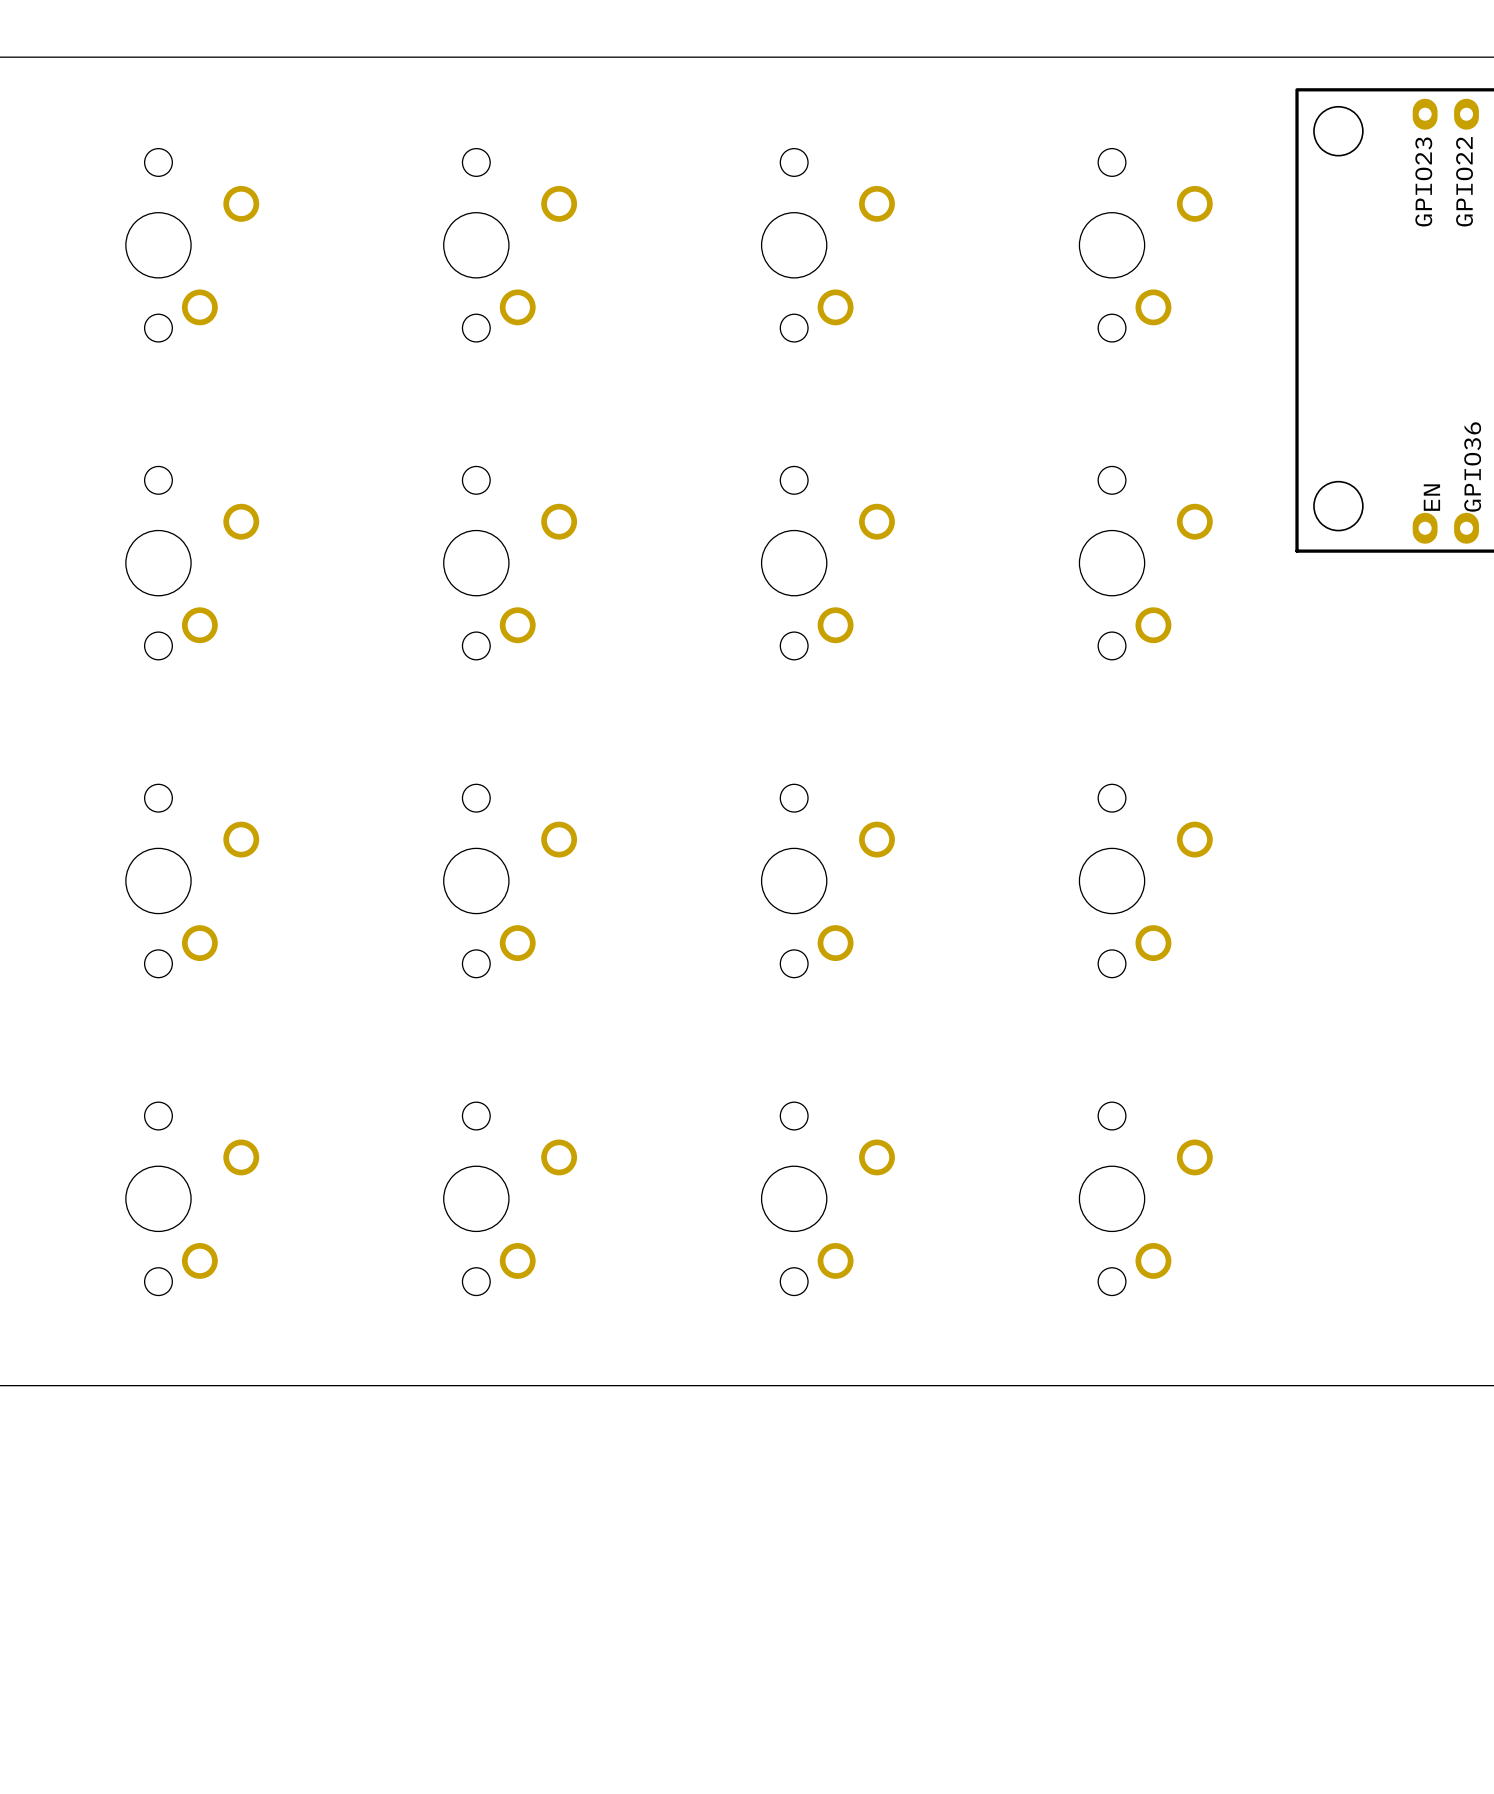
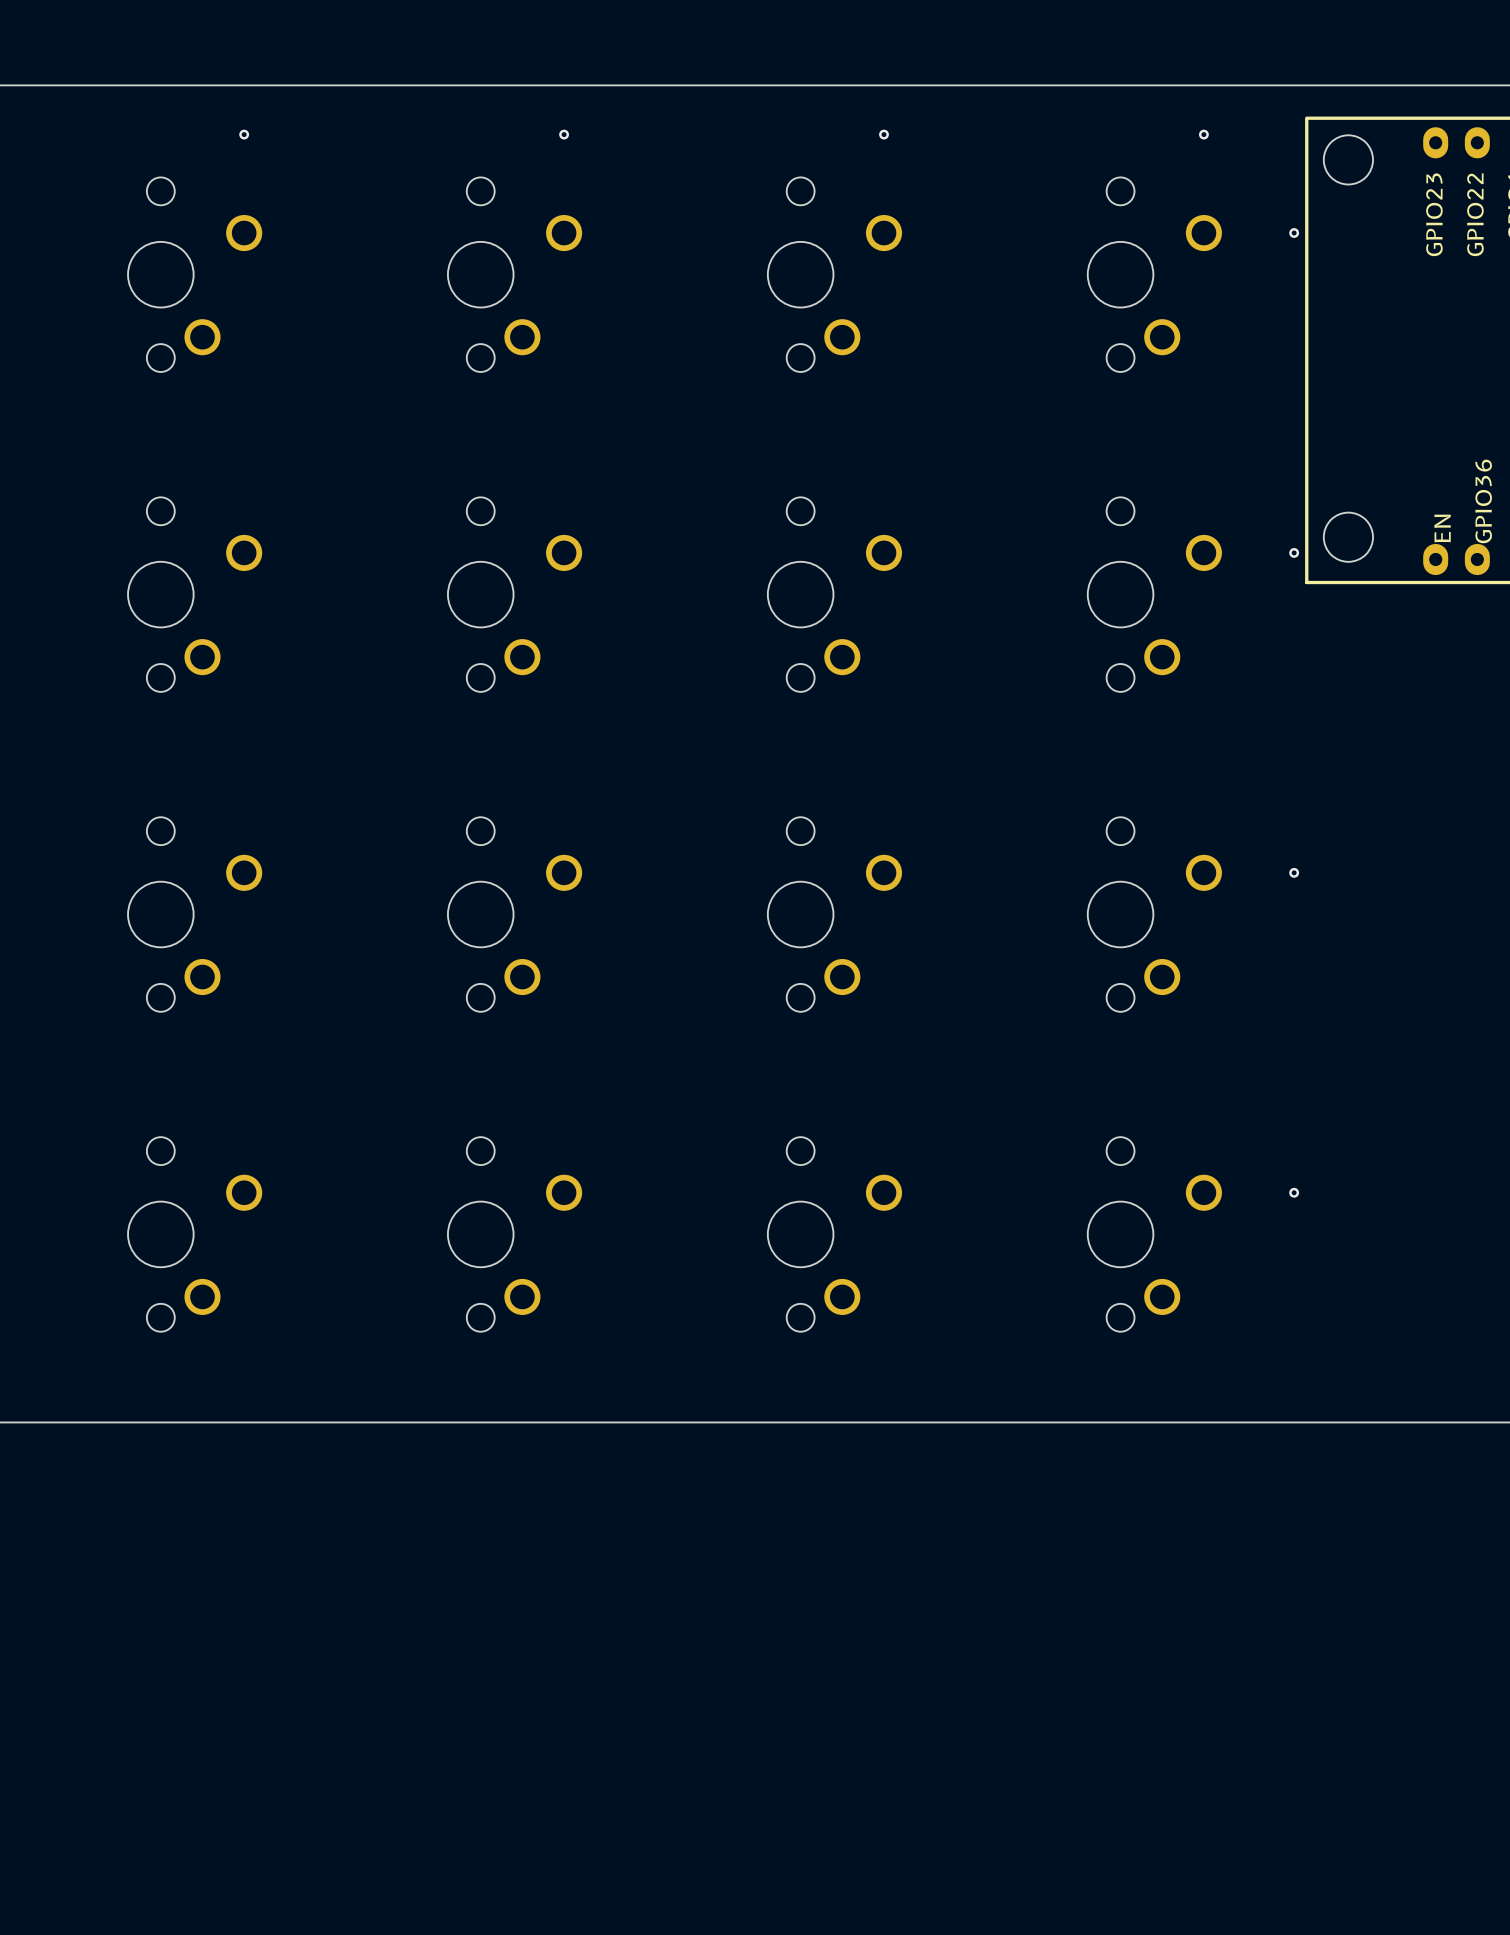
via: none -> (244, 134)
via: none -> (564, 134)
via: none -> (884, 134)
via: none -> (1203, 134)
via: none -> (1294, 233)
via: none -> (1294, 552)
via: none -> (1294, 872)
via: none -> (1294, 1192)

